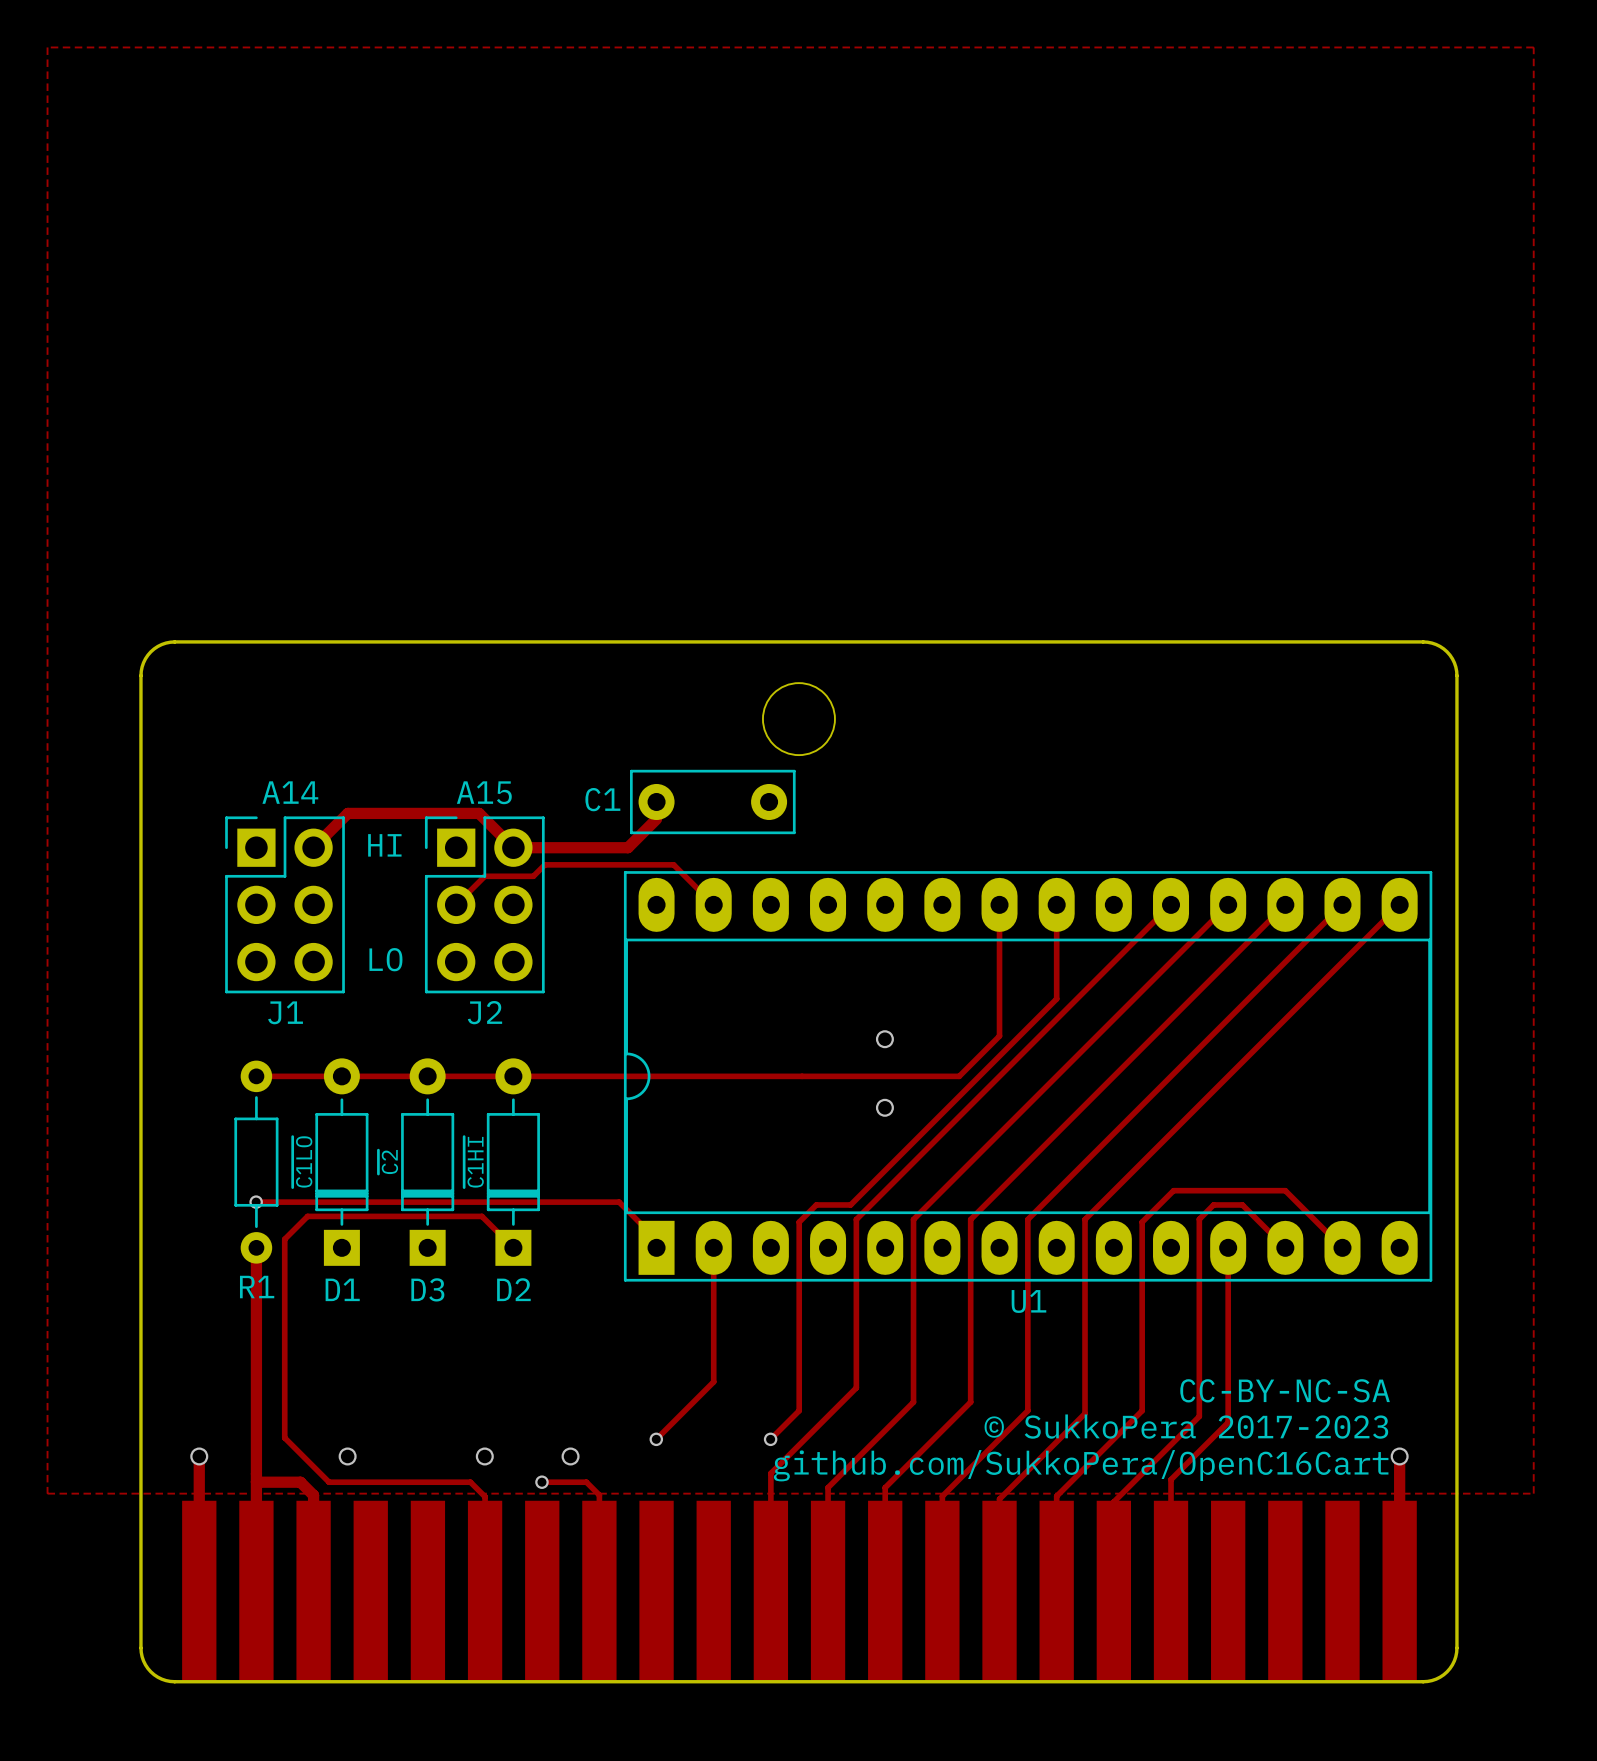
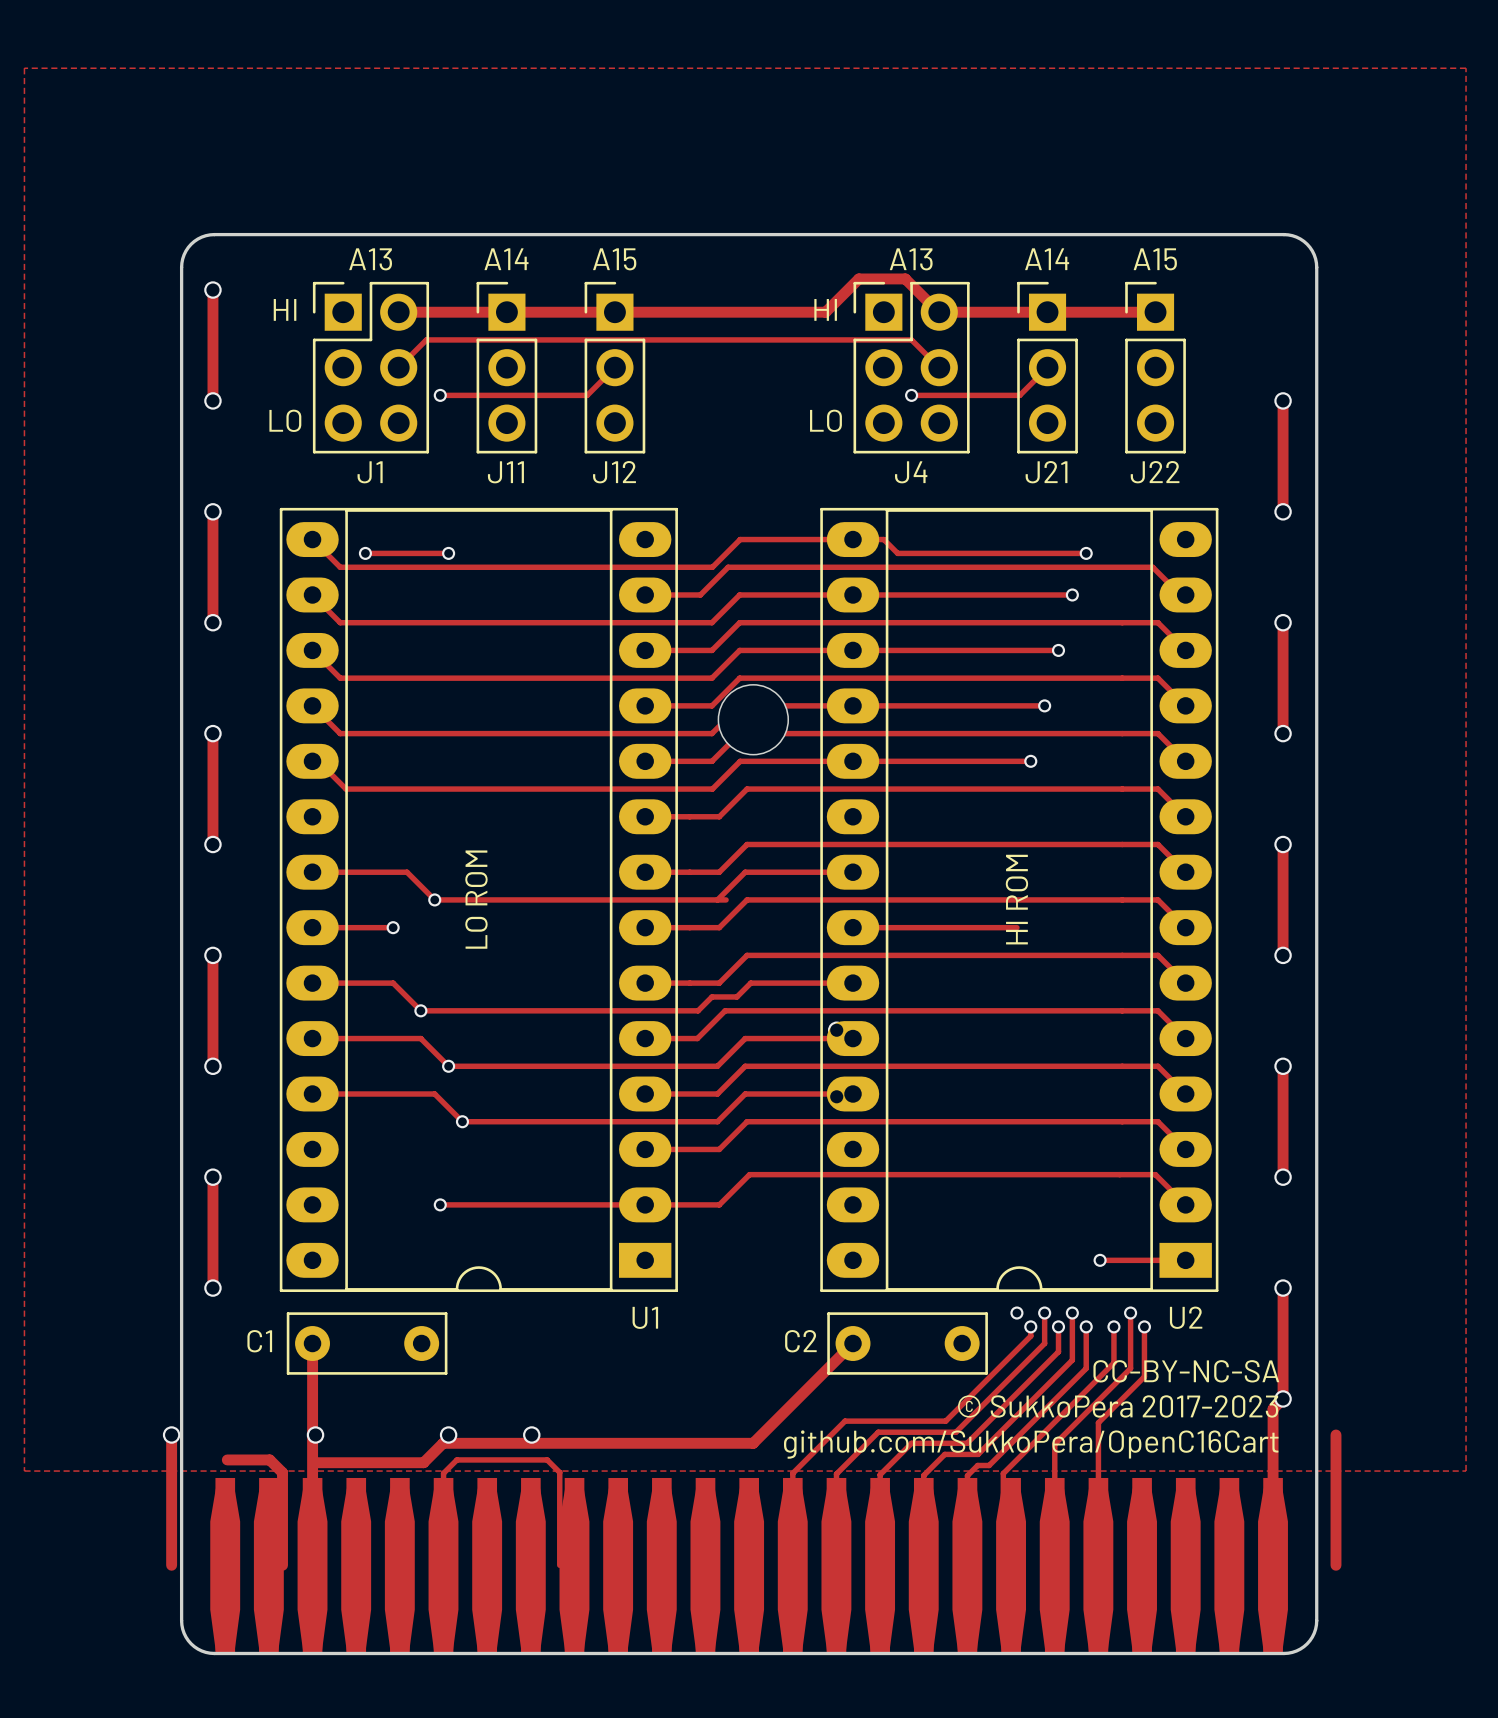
text: none -> A13 (370, 259)
text: none -> A14 (506, 259)
text: none -> A15 (614, 259)
text: none -> A13 (911, 259)
text: none -> A14 (1047, 259)
text: none -> A15 (1155, 259)
track: none -> (212, 290) (212, 400)
via: none -> (212, 290)
text: none -> HI (285, 309)
text: none -> HI (825, 309)
track: none -> (398, 312) (825, 312) (858, 278) (905, 278) (938, 312) (1155, 312)
track: none -> (398, 367) (426, 339) (911, 339) (939, 367)
J11: none -> (506, 367)
track: none -> (614, 367) (587, 395) (440, 395)
J12: none -> (614, 367)
J4: none -> (911, 367)
track: none -> (1047, 367) (1019, 395) (911, 395)
J21: none -> (1047, 367)
J22: none -> (1155, 367)
via: none -> (440, 395)
via: none -> (911, 395)
via: none -> (212, 400)
track: none -> (1283, 400) (1283, 511)
via: none -> (1283, 400)
text: none -> LO (285, 420)
text: none -> LO (825, 420)
track: none -> (212, 511) (212, 622)
via: none -> (212, 511)
via: none -> (1283, 511)
track: none -> (312, 539) (340, 567) (712, 567) (740, 539) (883, 539) (897, 553) (1086, 553)
track: none -> (365, 553) (448, 553)
via: none -> (365, 553)
via: none -> (448, 553)
via: none -> (1086, 553)
track: none -> (312, 594) (340, 622) (711, 622) (739, 594) (1072, 594)
track: none -> (645, 594) (700, 594) (728, 567) (1152, 567) (1180, 594) (1185, 594)
via: none -> (1072, 594)
via: none -> (212, 622)
track: none -> (1283, 622) (1283, 733)
via: none -> (1283, 622)
track: none -> (312, 650) (340, 678) (711, 678) (739, 650) (1058, 650)
track: none -> (645, 650) (711, 650) (739, 622) (1157, 622) (1185, 650)
via: none -> (1058, 650)
track: none -> (312, 705) (340, 733) (711, 733) (739, 705) (1044, 705)
track: none -> (645, 705) (711, 705) (739, 678) (1157, 678) (1185, 705)
via: none -> (1044, 705)
track: none -> (212, 733) (212, 844)
via: none -> (212, 733)
via: none -> (1283, 733)
track: none -> (312, 761) (318, 761) (346, 789) (712, 789) (740, 761) (1030, 761)
track: none -> (645, 761) (711, 761) (739, 733) (1157, 733) (1185, 761)
via: none -> (1030, 761)
text: A14 (290, 792) -> none
text: A15 (484, 792) -> none
C1 position: (712, 801) -> (367, 1343)
track: (656, 819) (627, 847) (513, 847) (479, 813) (347, 813) (313, 847) -> none
track: none -> (645, 816) (719, 816) (747, 789) (1157, 789) (1185, 816)
text: HI (384, 845) -> none
via: none -> (212, 844)
track: none -> (1283, 844) (1283, 955)
via: none -> (1283, 844)
track: none -> (312, 872) (407, 872) (434, 899) (717, 899) (745, 872) (856, 872)
track: none -> (645, 872) (719, 872) (747, 844) (1157, 844) (1185, 872)
text: none -> LO ROM (476, 899)
J1 position: (285, 904) -> (370, 367)
track: (456, 904) (484, 876) (533, 876) (544, 864) (673, 864) (713, 904) -> none
via: none -> (434, 899)
J2: (484, 904) -> none
track: (999, 904) (999, 1036) (959, 1076) -> (1185, 1094) (1157, 1066) (908, 1066)
track: (1056, 904) (1056, 998) (850, 1204) (816, 1204) (799, 1222) (799, 1410) (770, 1439) -> none
text: none -> HI ROM (1016, 899)
U2: none -> (1019, 899)
track: (1171, 904) (856, 1219) (856, 1387) (770, 1473) (770, 1590) -> none
track: (1228, 904) (913, 1219) (913, 1402) (828, 1487) (828, 1590) -> none
track: (1285, 904) (970, 1219) (970, 1402) (885, 1487) (885, 1590) -> none
track: (1342, 904) (1027, 1219) (1027, 1410) (942, 1496) (942, 1590) -> none
track: (1399, 904) (1085, 1219) (1085, 1345) -> none
track: none -> (312, 927) (393, 927)
via: none -> (393, 927)
track: none -> (645, 927) (719, 927) (747, 899) (1157, 899) (1185, 927)
track: none -> (853, 927) (1016, 927)
text: LO (385, 959) -> none
track: none -> (212, 955) (212, 1066)
via: none -> (212, 955)
via: none -> (1283, 955)
track: none -> (312, 983) (393, 983) (420, 1010) (698, 1010) (711, 996) (736, 996) (750, 983) (853, 983)
track: none -> (645, 983) (719, 983) (747, 955) (1157, 955) (1185, 983)
via: none -> (420, 1010)
track: none -> (645, 1038) (697, 1038) (725, 1010) (1157, 1010) (1185, 1038)
track: none -> (856, 1038) (745, 1038) (717, 1066)
via: none -> (212, 1066)
track: (256, 1076) (484, 1076) -> (312, 1038) (420, 1038) (448, 1066)
via: none -> (448, 1066)
track: (762, 1076) (790, 1076) -> (645, 1094) (717, 1094) (745, 1066)
U1 rotation: 0° (1028, 1076) -> 90° counterclockwise (478, 899)
U1 position: (1028, 1076) -> (478, 899)
track: none -> (1283, 1066) (1283, 1177)
via: none -> (1283, 1066)
track: none -> (312, 1094) (434, 1094) (462, 1121) (717, 1121) (745, 1094) (856, 1094)
via: none -> (462, 1121)
text: ~{C1LO} (302, 1161) -> none
R1: (256, 1162) -> none
D1: (341, 1162) -> none
text: ~{C2} (388, 1162) -> none
D3: (427, 1162) -> none
text: ~{C1HI} (473, 1162) -> none
D2: (513, 1162) -> none
track: none -> (645, 1149) (719, 1149) (747, 1121) (1157, 1121) (1185, 1149)
track: none -> (212, 1177) (212, 1288)
via: none -> (1283, 1177)
track: (256, 1202) (619, 1202) (656, 1239) (656, 1247) -> none
via position: (256, 1202) -> (212, 1177)
track: none -> (440, 1204) (719, 1204) (749, 1174) (1155, 1174) (1185, 1204)
via: none -> (440, 1204)
track: (256, 1247) (256, 1590) -> none
track: (513, 1247) (481, 1216) (307, 1216) (284, 1239) (284, 1437) (329, 1482) (470, 1482) (485, 1496) (485, 1590) -> none
track: (713, 1247) (713, 1381) (656, 1439) -> none
track: (1228, 1247) (1228, 1422) (1171, 1479) (1171, 1590) -> none
track: (1285, 1247) (1242, 1204) (1213, 1204) (1199, 1219) (1199, 1416) (1113, 1501) (1113, 1590) -> none
track: (1342, 1247) (1285, 1190) (1173, 1190) (1142, 1222) (1142, 1345) -> none
track: none -> (1100, 1260) (1185, 1260)
via: none -> (1100, 1260)
U1 name position: U1 (1028, 1301) -> U1 (645, 1317)
via: none -> (212, 1288)
track: none -> (1283, 1288) (1283, 1398) (1273, 1408) (1273, 1566)
via: none -> (1283, 1288)
via: none -> (1016, 1313)
track: none -> (1044, 1313) (1044, 1343) (955, 1432) (878, 1432) (836, 1474) (836, 1566)
via: none -> (1044, 1313)
track: none -> (1072, 1313) (1072, 1360) (978, 1454) (944, 1454) (923, 1475) (923, 1565)
via: none -> (1072, 1313)
track: none -> (1130, 1313) (1130, 1368) (1054, 1444) (1054, 1566)
via: none -> (1130, 1313)
via: none -> (1030, 1326)
track: none -> (1058, 1326) (1058, 1351) (967, 1443) (911, 1443) (880, 1474) (880, 1566)
via: none -> (1058, 1326)
via: none -> (1086, 1326)
via: none -> (1113, 1326)
track: none -> (1144, 1326) (1144, 1376) (1098, 1422) (1098, 1566)
via: none -> (1144, 1326)
track: (1085, 1354) (1085, 1413) (999, 1499) (999, 1590) -> (1030, 1336) (945, 1421) (845, 1421) (792, 1473) (792, 1566)
track: none -> (312, 1343) (312, 1566)
track: none -> (853, 1343) (753, 1443) (443, 1443) (423, 1462) (317, 1462)
C2: none -> (907, 1343)
track: (1142, 1387) (1142, 1410) -> (1113, 1326) (1113, 1362) (1086, 1390)
track: none -> (1086, 1368) (989, 1465) (977, 1465) (967, 1475) (967, 1565)
text position: CC-BY-NC-SA (1285, 1390) -> CC-BY-NC-SA (1186, 1371)
text position: © SukkoPera 2017-2023 (1186, 1426) -> © SukkoPera 2017-2023 (1118, 1406)
via: (656, 1439) -> none
via: (770, 1439) -> none
via position: (1399, 1456) -> (1283, 1398)
text position: github.com/SukkoPera/OpenC16Cart (1081, 1465) -> github.com/SukkoPera/OpenC16Cart (1031, 1444)
track: none -> (504, 1459) (456, 1459) (443, 1473) (443, 1566)
via: (541, 1482) -> none
part footprint: [182, 1500, 1417, 1681] -> [210, 1477, 1288, 1653]
board edge: (243, 1681) (165, 1680) (154, 1674) (147, 1668) (141, 1652) (140, 675) (143, 662) (150, 651) (161, 644) (174, 641) (1427, 642) (1440, 646) (1449, 655) (1455, 666) (1456, 675) (1456, 1652) (1454, 1660) (1447, 1671) (1431, 1680) (1346, 1681) -> (214, 1653) (201, 1650) (191, 1643) (184, 1633) (181, 1620) (181, 267) (184, 254) (191, 244) (201, 237) (214, 234) (1283, 234) (1296, 237) (1309, 247) (1315, 258) (1316, 267) (1316, 1620) (1314, 1633) (1307, 1643) (1296, 1650) (1283, 1653)

